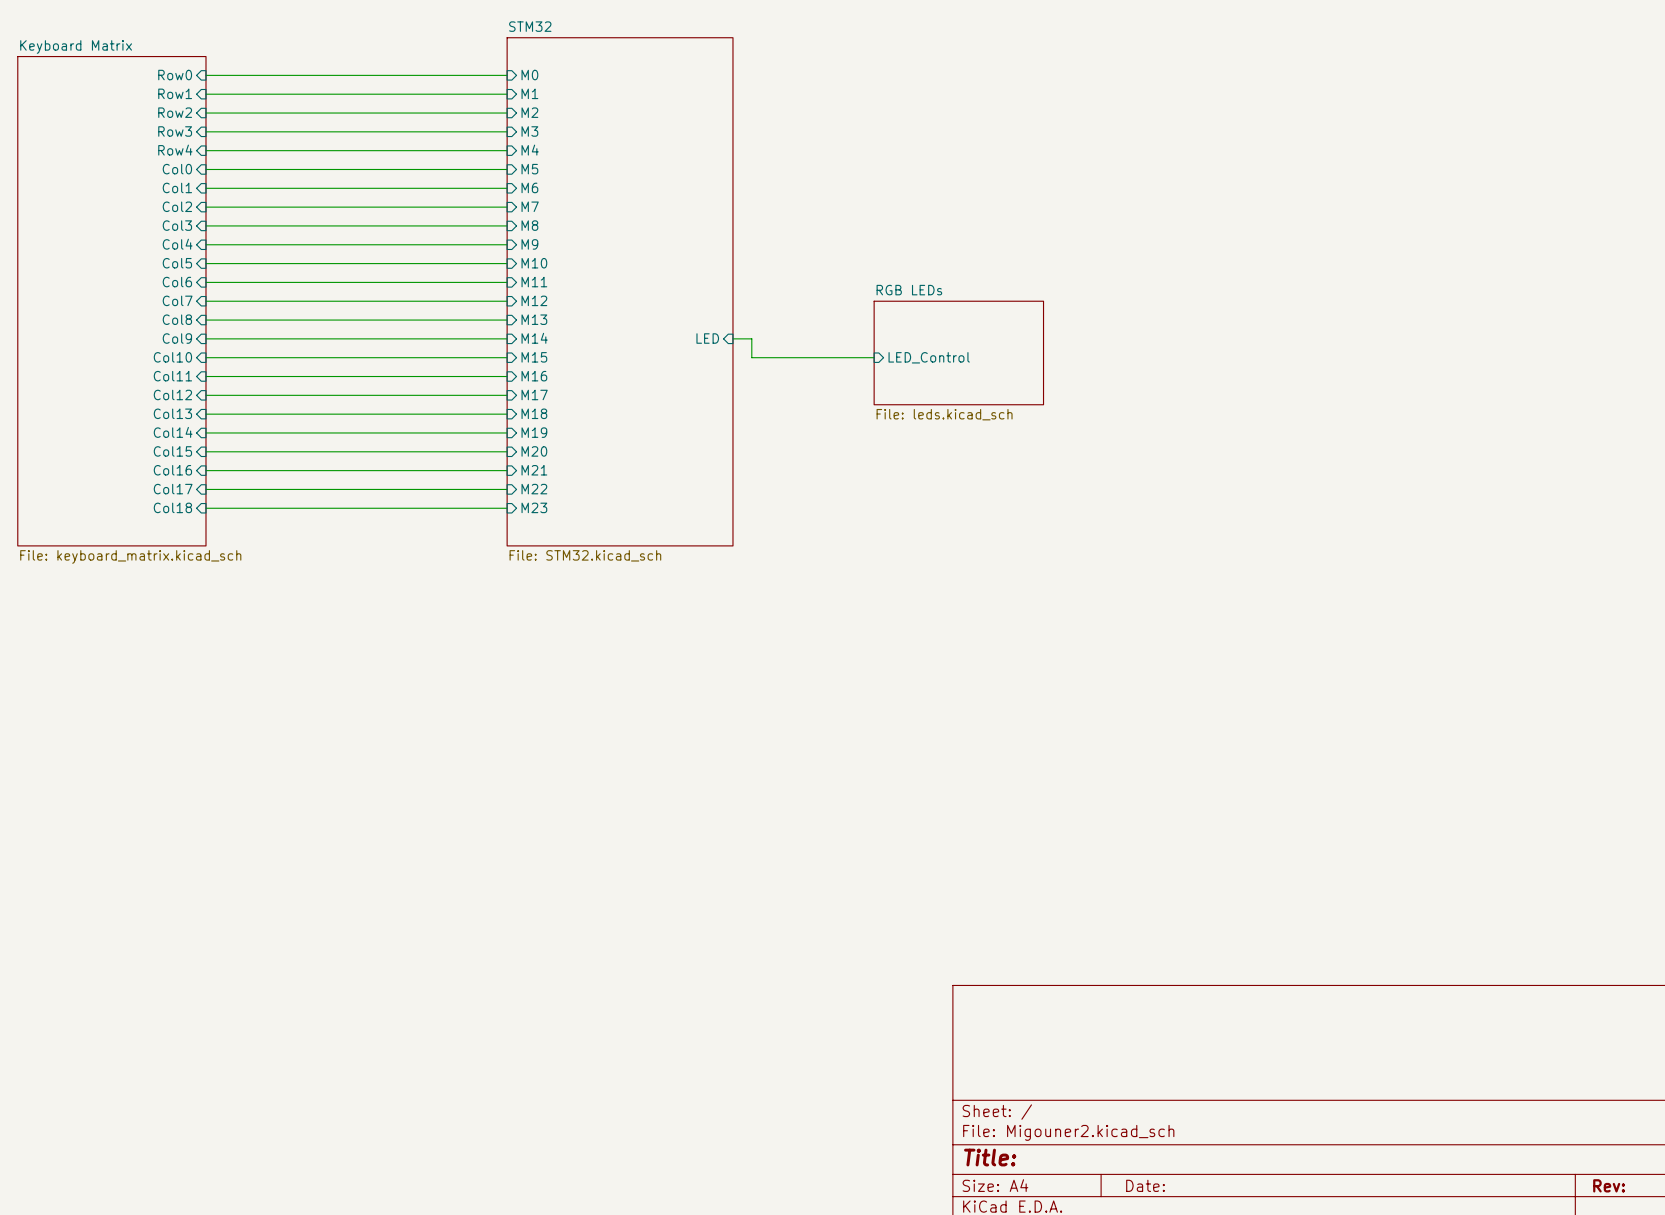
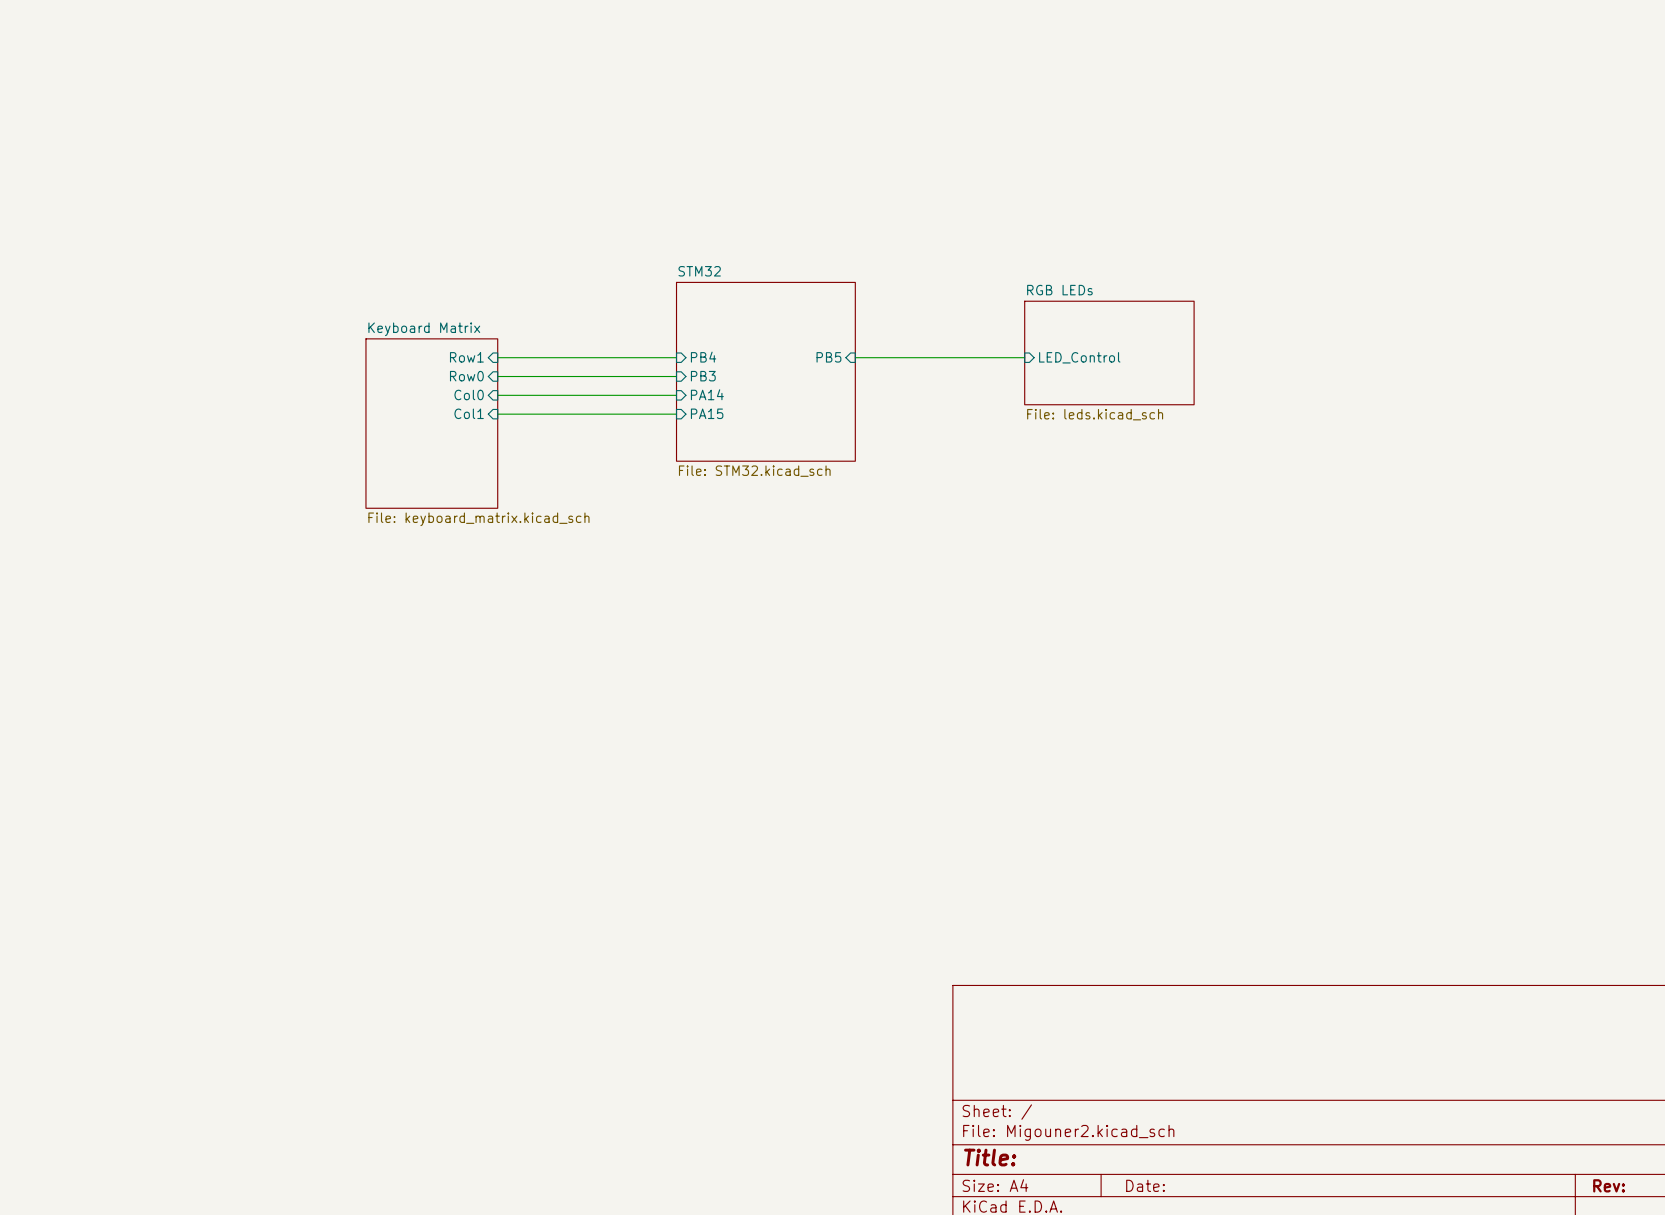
sheet STM32 name position: STM32 (530, 26) -> STM32 (699, 271)
sheet STM32 shape: [506, 37, 734, 547] -> [675, 281, 856, 462]
sheet pin: Row0 (175, 75) -> none
wire: (205, 75) (507, 75) -> none
sheet pin: M0 (529, 75) -> none
sheet pin: Row1 (175, 93) -> none
sheet pin: M1 (529, 93) -> none
wire: (205, 94) (507, 94) -> none
sheet pin: Row2 (175, 112) -> none
sheet pin: M2 (529, 112) -> none
wire: (205, 113) (507, 113) -> none
sheet pin: Row3 (175, 131) -> none
wire: (205, 131) (507, 131) -> none
sheet pin: M3 (529, 131) -> none
sheet pin: Row4 (175, 150) -> none
wire: (205, 150) (507, 150) -> none
sheet pin: M4 (530, 150) -> none
sheet pin: Col0 (177, 169) -> none
wire: (205, 169) (507, 169) -> none
sheet pin: M5 (529, 169) -> none
sheet pin: Col1 (177, 187) -> none
sheet pin: M6 (529, 187) -> none
wire: (205, 188) (507, 188) -> none
sheet pin: Col2 (177, 206) -> none
sheet pin: M7 (530, 206) -> none
wire: (205, 207) (507, 207) -> none
sheet pin: Col3 (177, 225) -> none
wire: (205, 225) (507, 225) -> none
sheet pin: M8 (529, 225) -> none
sheet pin: Col4 (177, 244) -> none
wire: (205, 244) (507, 244) -> none
sheet pin: M9 (529, 244) -> none
sheet pin: Col5 (177, 263) -> none
wire: (205, 263) (507, 263) -> none
sheet pin: M10 (534, 263) -> none
sheet pin: Col6 (177, 282) -> none
wire: (205, 282) (507, 282) -> none
sheet pin: M11 (534, 282) -> none
sheet pin: Col7 (177, 300) -> none
sheet pin: M12 (534, 300) -> none
sheet Keyboard Matrix: File: keyboard_matrix.kicad_sch (111, 301) -> none
wire: (205, 301) (507, 301) -> none
sheet pin: Col8 (177, 319) -> none
sheet pin: M13 (534, 319) -> none
wire: (205, 320) (507, 320) -> none
sheet pin: Col9 (177, 338) -> none
wire: (205, 338) (507, 338) -> none
sheet pin: M14 (534, 338) -> none
sheet pin: LED (707, 338) -> none
wire: (732, 338) (751, 338) (751, 357) (855, 357) -> none
sheet RGB LEDs position: (958, 352) -> (1109, 352)
sheet pin: Col10 (172, 357) -> none
wire: (205, 357) (497, 357) -> none
sheet pin: none -> Row1 (466, 357)
wire: none -> (507, 357) (676, 357)
sheet pin: M15 (534, 357) -> none
sheet pin: none -> PB4 (703, 357)
sheet pin: none -> PB5 (828, 357)
wire: none -> (874, 357) (1024, 357)
sheet pin position: LED_Control (929, 357) -> LED_Control (1079, 357)
sheet pin: Col11 (172, 376) -> none
wire: (205, 376) (497, 376) -> none
sheet pin: none -> Row0 (466, 376)
wire: none -> (507, 376) (676, 376)
sheet pin: M16 (534, 376) -> none
sheet pin: none -> PB3 (703, 376)
sheet pin: Col12 (172, 394) -> none
sheet pin: none -> Col0 (469, 394)
sheet pin: M17 (534, 394) -> none
sheet pin: none -> PA14 (707, 394)
wire: (205, 395) (497, 395) -> none
wire: none -> (507, 395) (676, 395)
sheet pin: Col13 (172, 413) -> none
sheet pin: none -> Col1 (469, 413)
sheet pin: M18 (534, 413) -> none
sheet pin: none -> PA15 (707, 413)
wire: (205, 414) (497, 414) -> none
wire: none -> (507, 414) (676, 414)
sheet Keyboard Matrix: none -> File: keyboard_matrix.kicad_sch (431, 423)
sheet pin: Col14 (173, 432) -> none
wire: (205, 432) (507, 432) -> none
sheet pin: M19 (534, 432) -> none
sheet pin: Col15 (172, 451) -> none
wire: (205, 451) (507, 451) -> none
sheet pin: M20 (534, 451) -> none
sheet pin: Col16 (172, 470) -> none
wire: (205, 470) (507, 470) -> none
sheet pin: M21 (534, 470) -> none
sheet pin: Col17 (173, 489) -> none
wire: (205, 489) (507, 489) -> none
sheet pin: M22 (534, 489) -> none
sheet pin: Col18 (172, 507) -> none
sheet pin: M23 (534, 507) -> none
wire: (205, 508) (507, 508) -> none
sheet STM32 value position: File: STM32.kicad_sch (585, 555) -> File: STM32.kicad_sch (754, 471)

